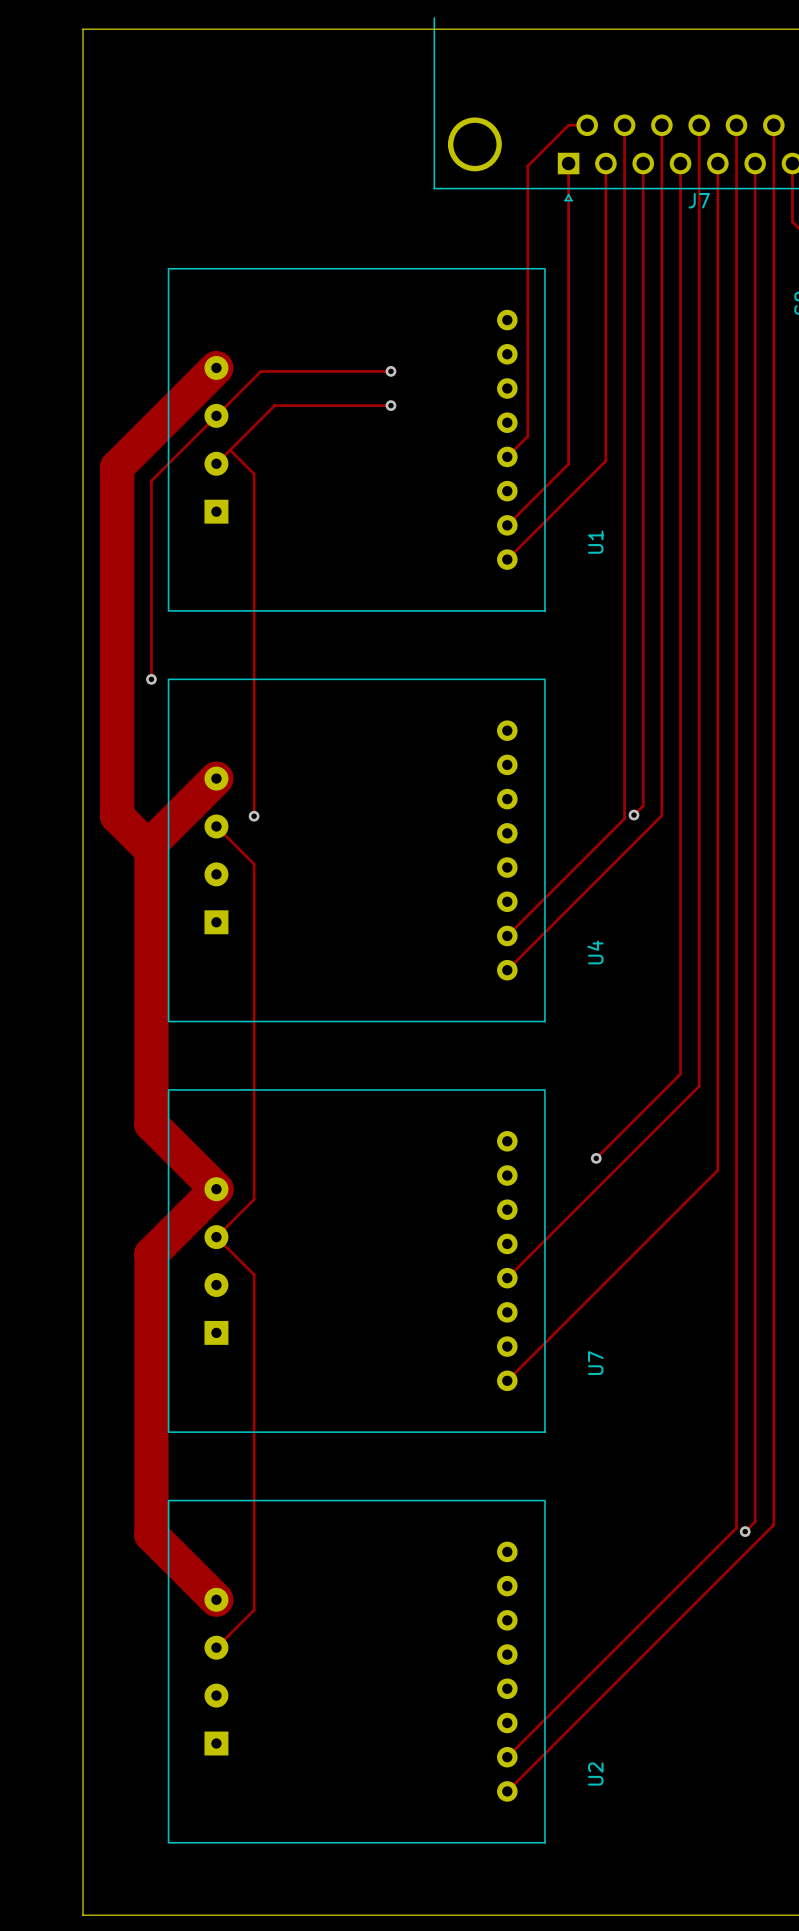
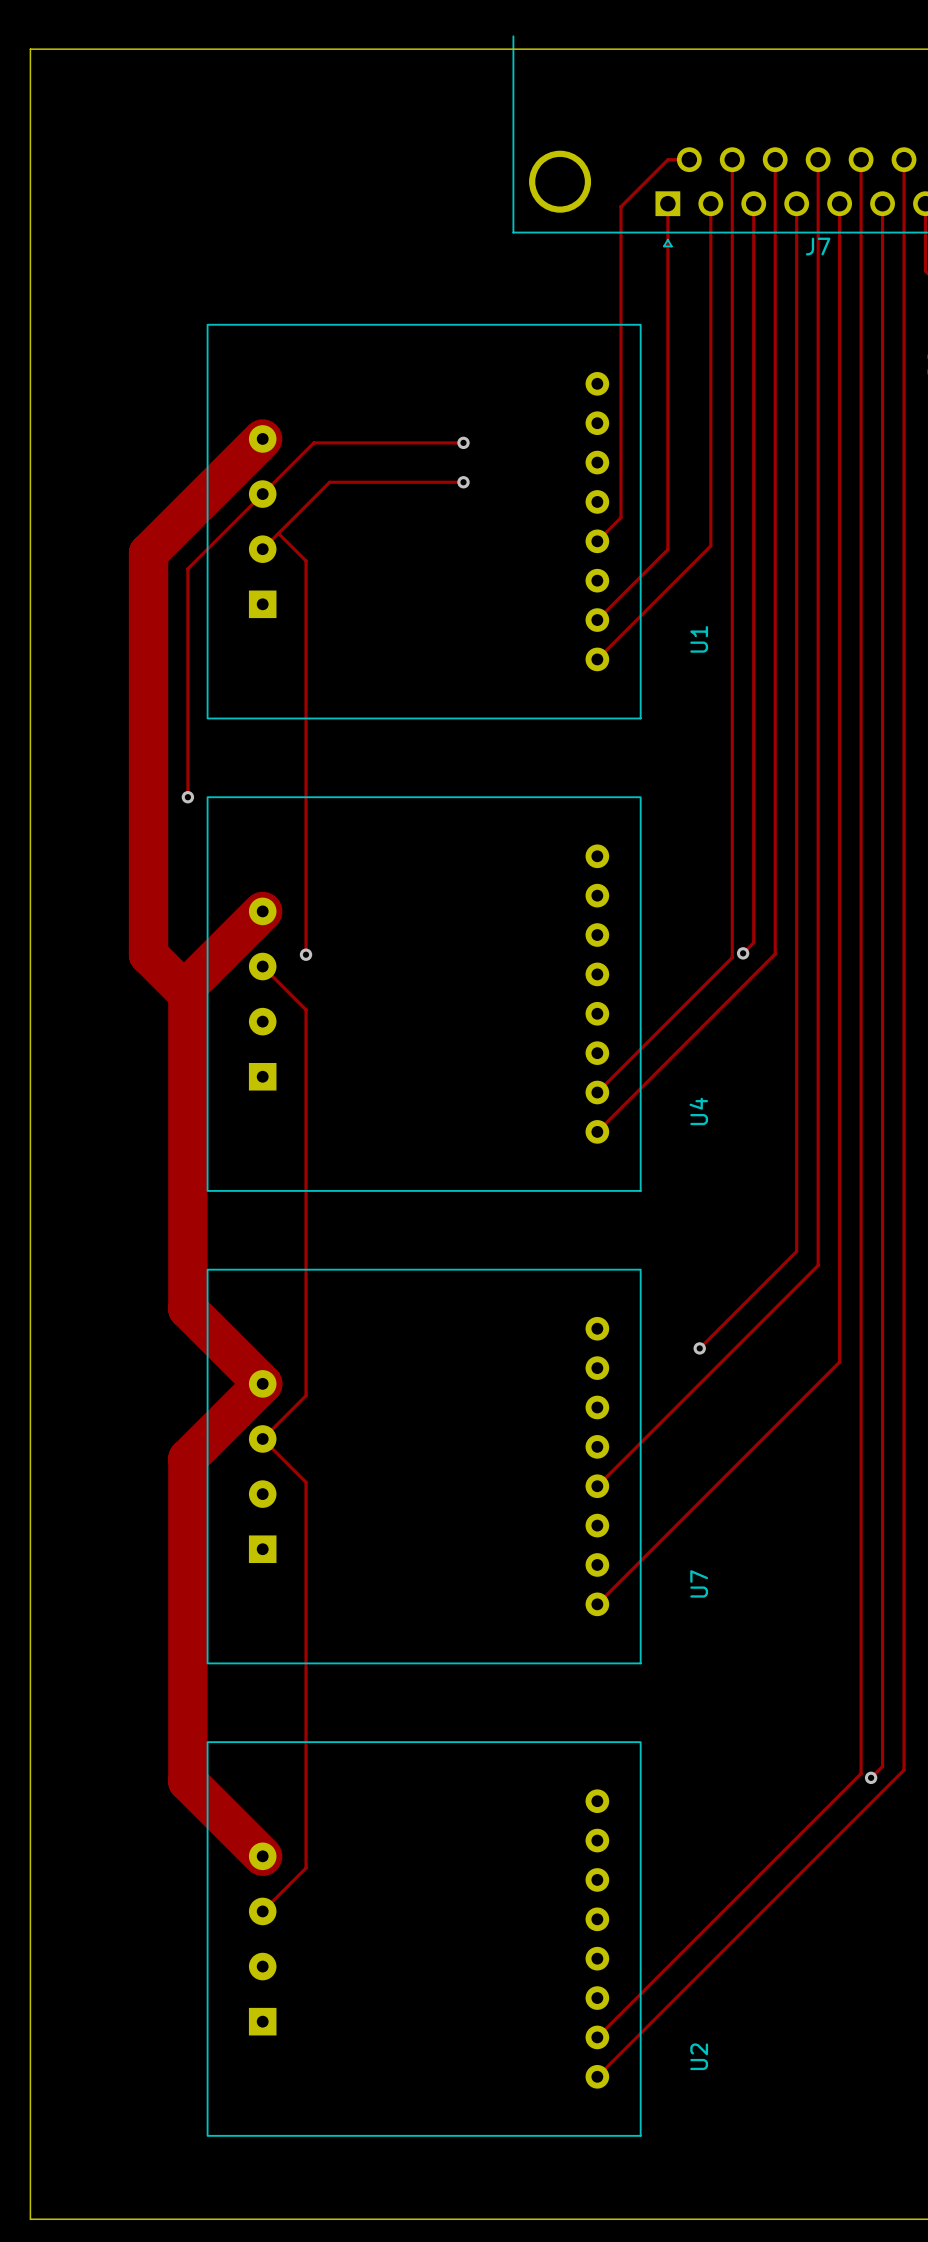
board edge: (83, 29) (83, 1915) -> (109, 49) (30, 49) (30, 2219) (109, 2219)

